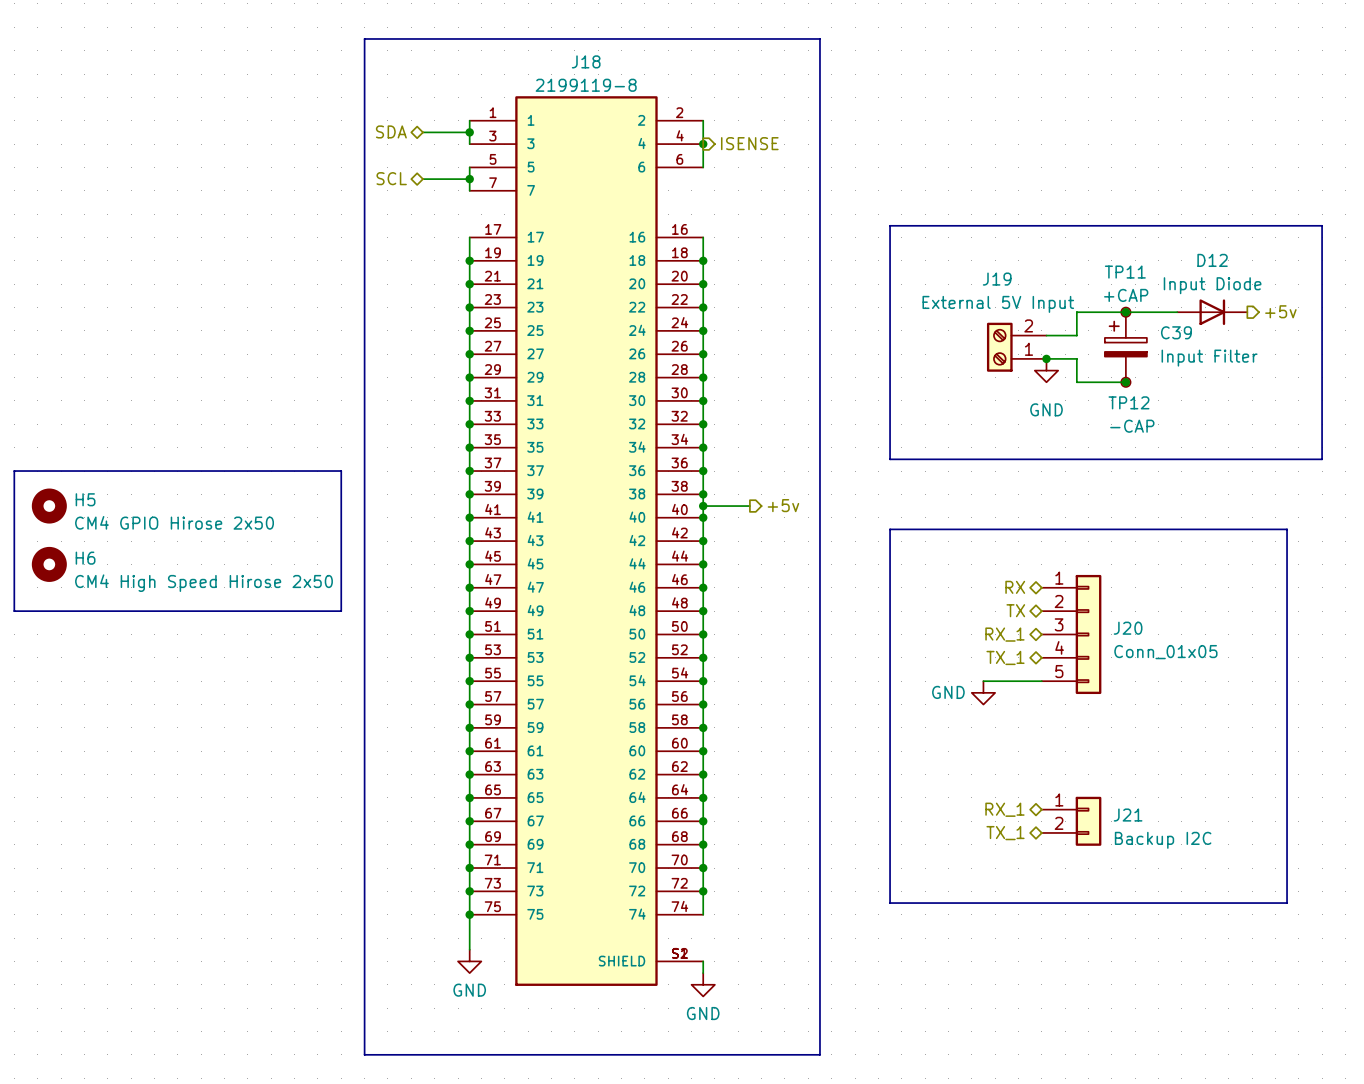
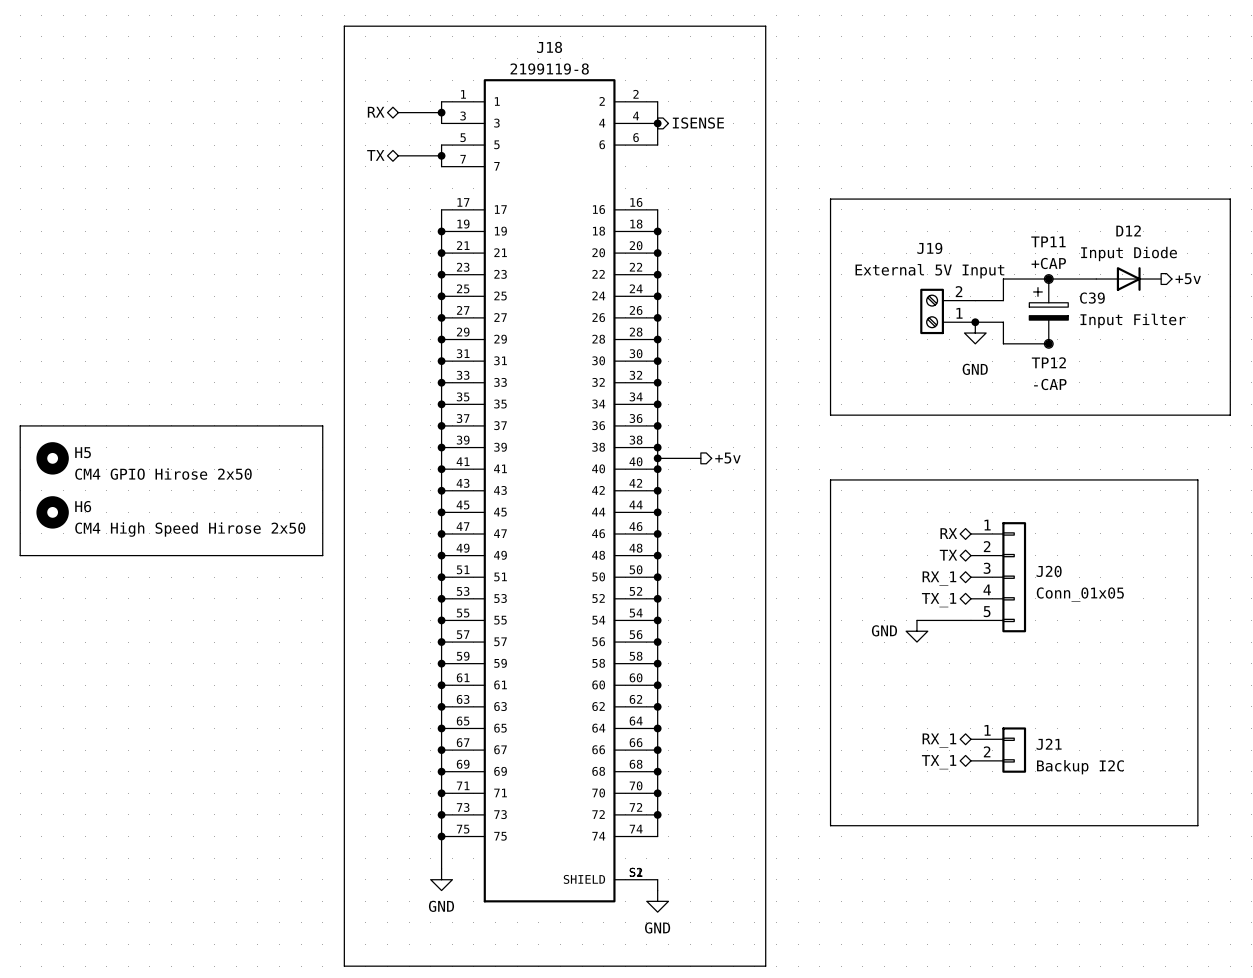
hierarchical label: SDA (391, 131) -> RX (376, 112)
hierarchical label: SCL (391, 178) -> TX (375, 155)

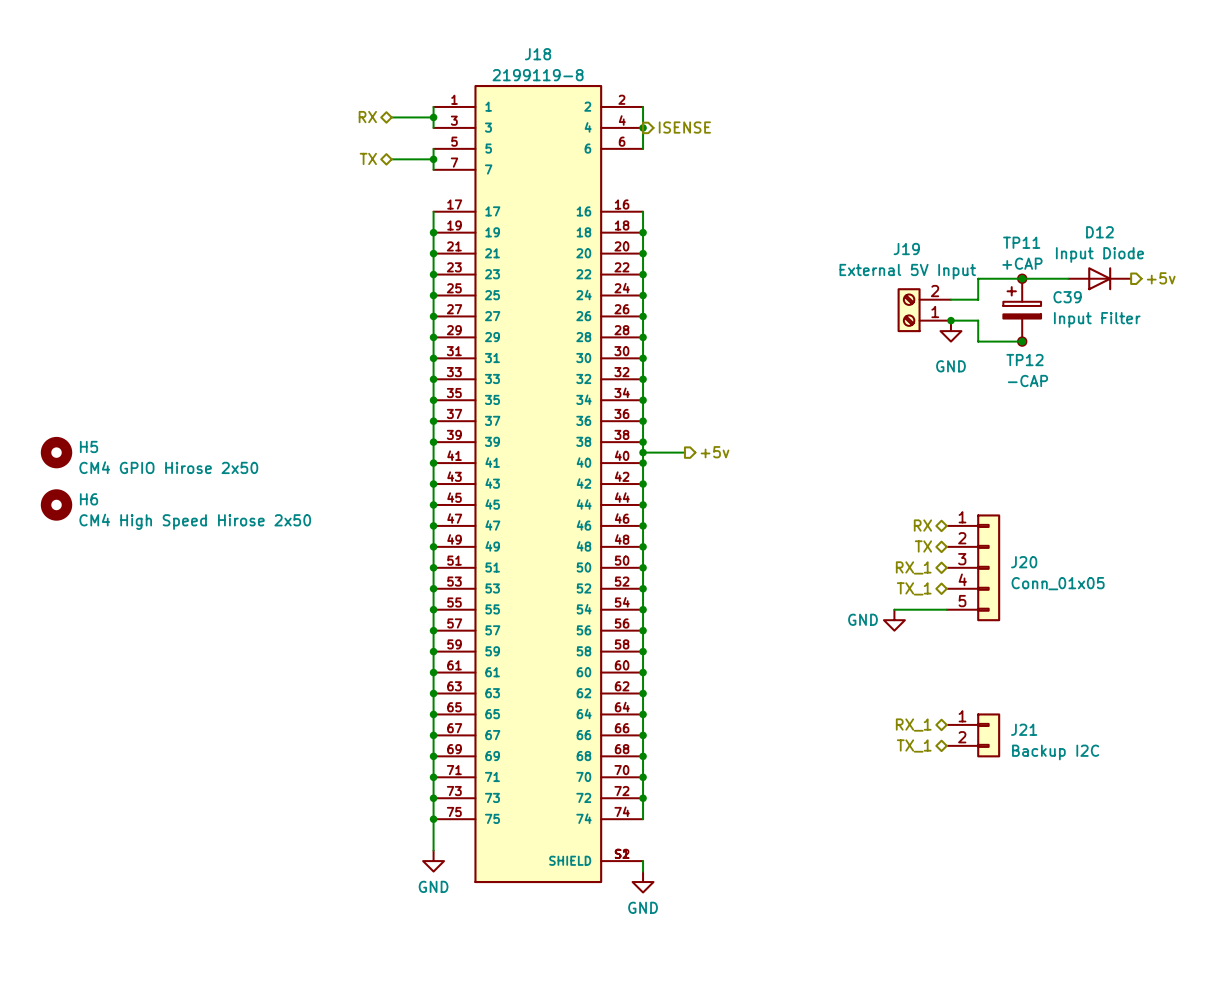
line: (344, 26) (765, 26) (765, 966) (344, 966) (344, 26) -> none
line: (830, 199) (830, 415) (1230, 415) (1230, 199) (830, 199) -> none
line: (20, 425) (322, 425) (322, 555) (20, 555) (20, 425) -> none
line: (830, 479) (1197, 479) (1197, 825) (830, 825) (830, 479) -> none

